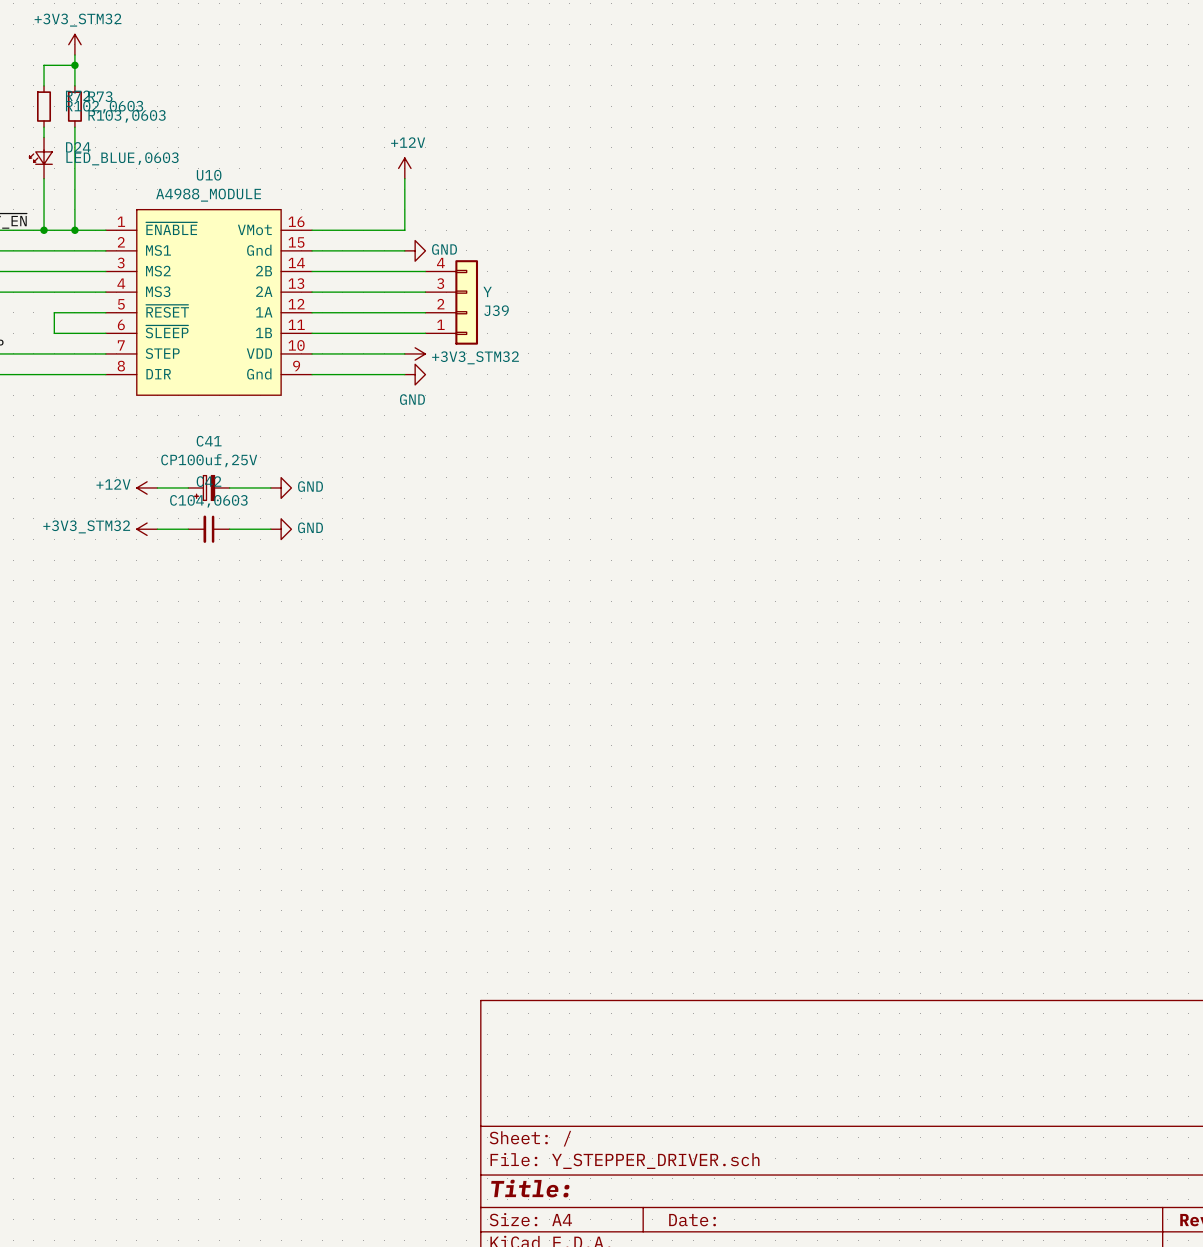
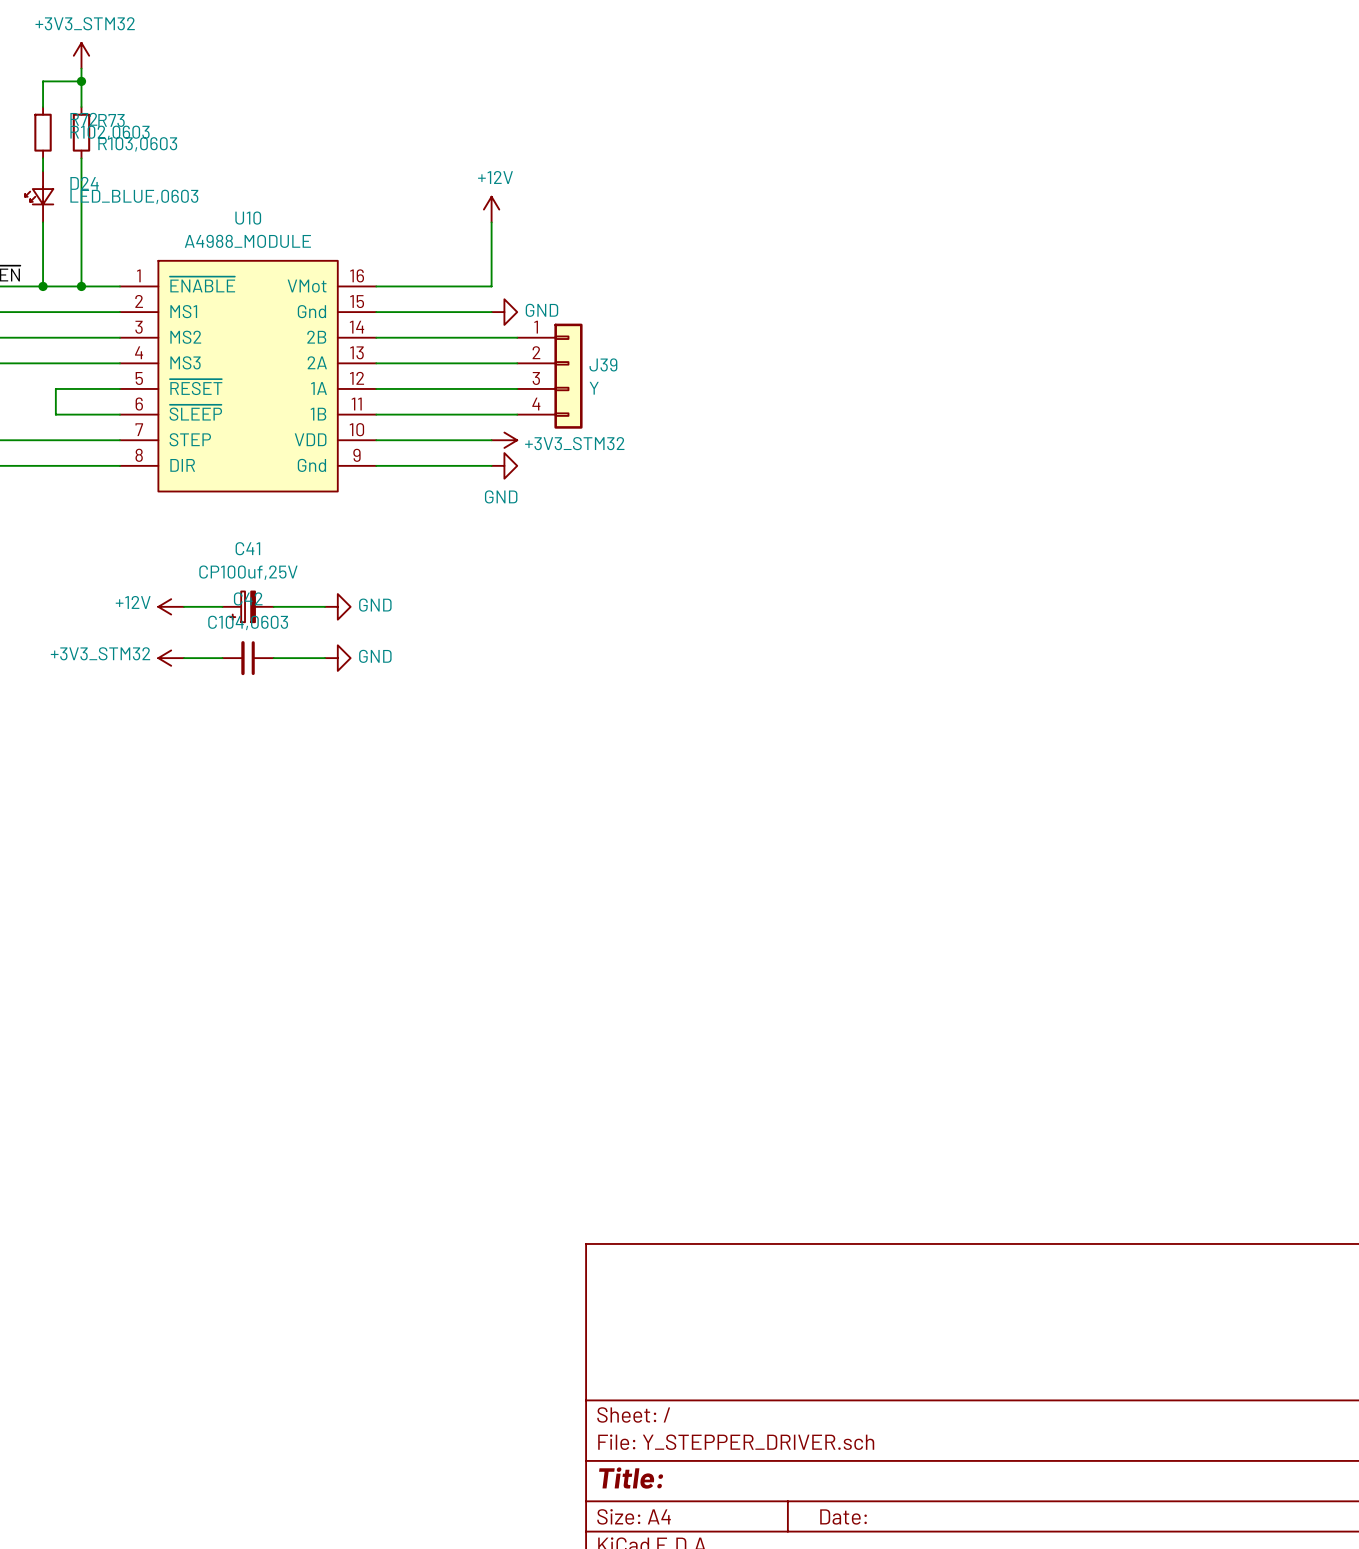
J39 flip: as is (466, 302) -> up-down (568, 376)

